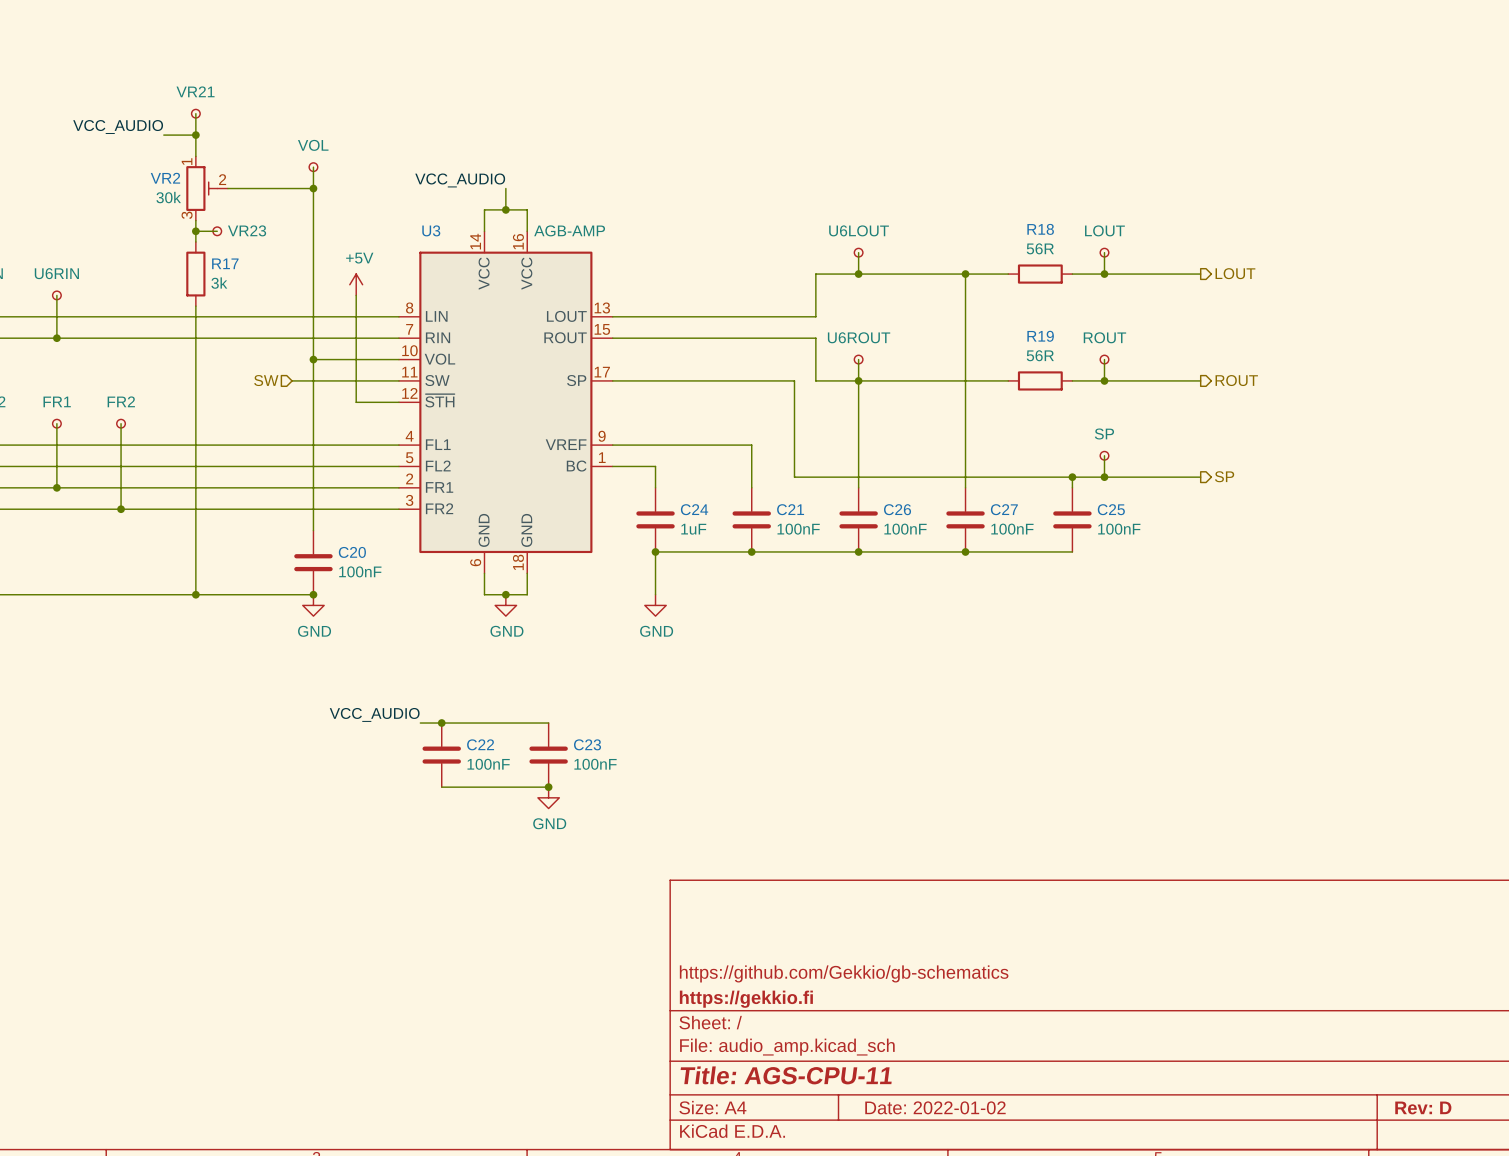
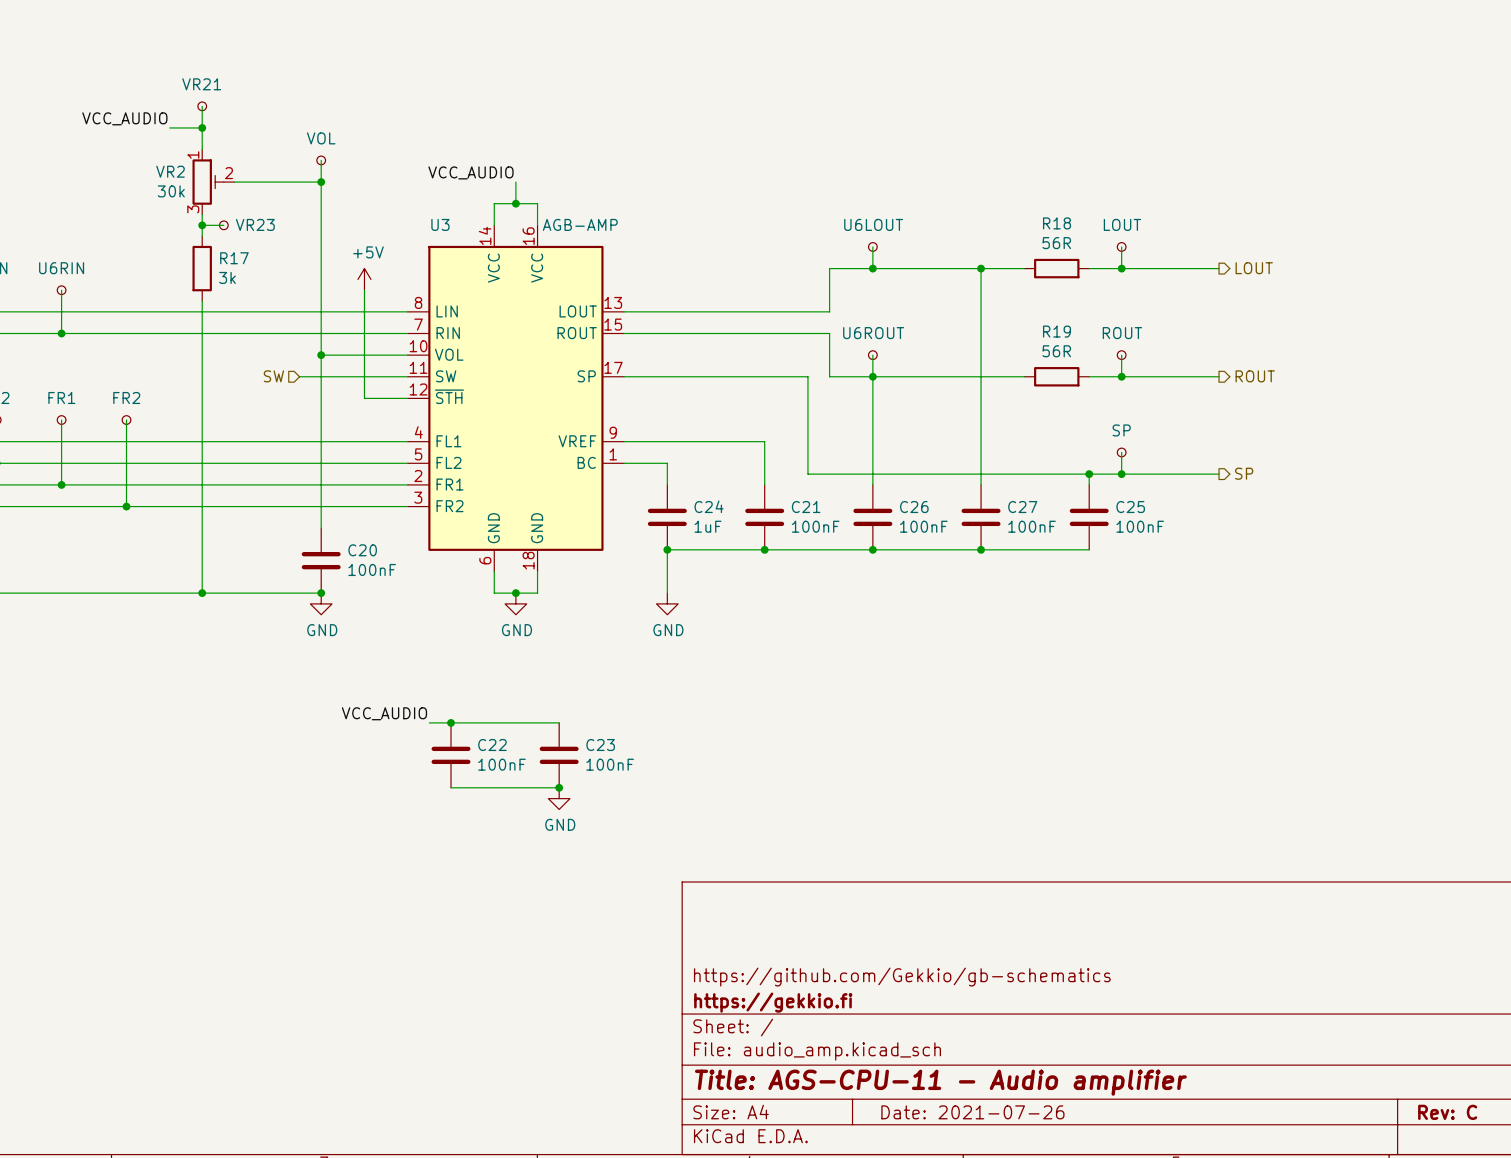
title block: Title: AGS-CPU-11 (786, 1075) -> Title: AGS-CPU-11 - Audio amplifier (940, 1082)
title block: Date: 2022-01-02 (935, 1107) -> Date: 2021-07-26 (972, 1112)
title block: Rev: D (1423, 1107) -> Rev: C (1447, 1112)

